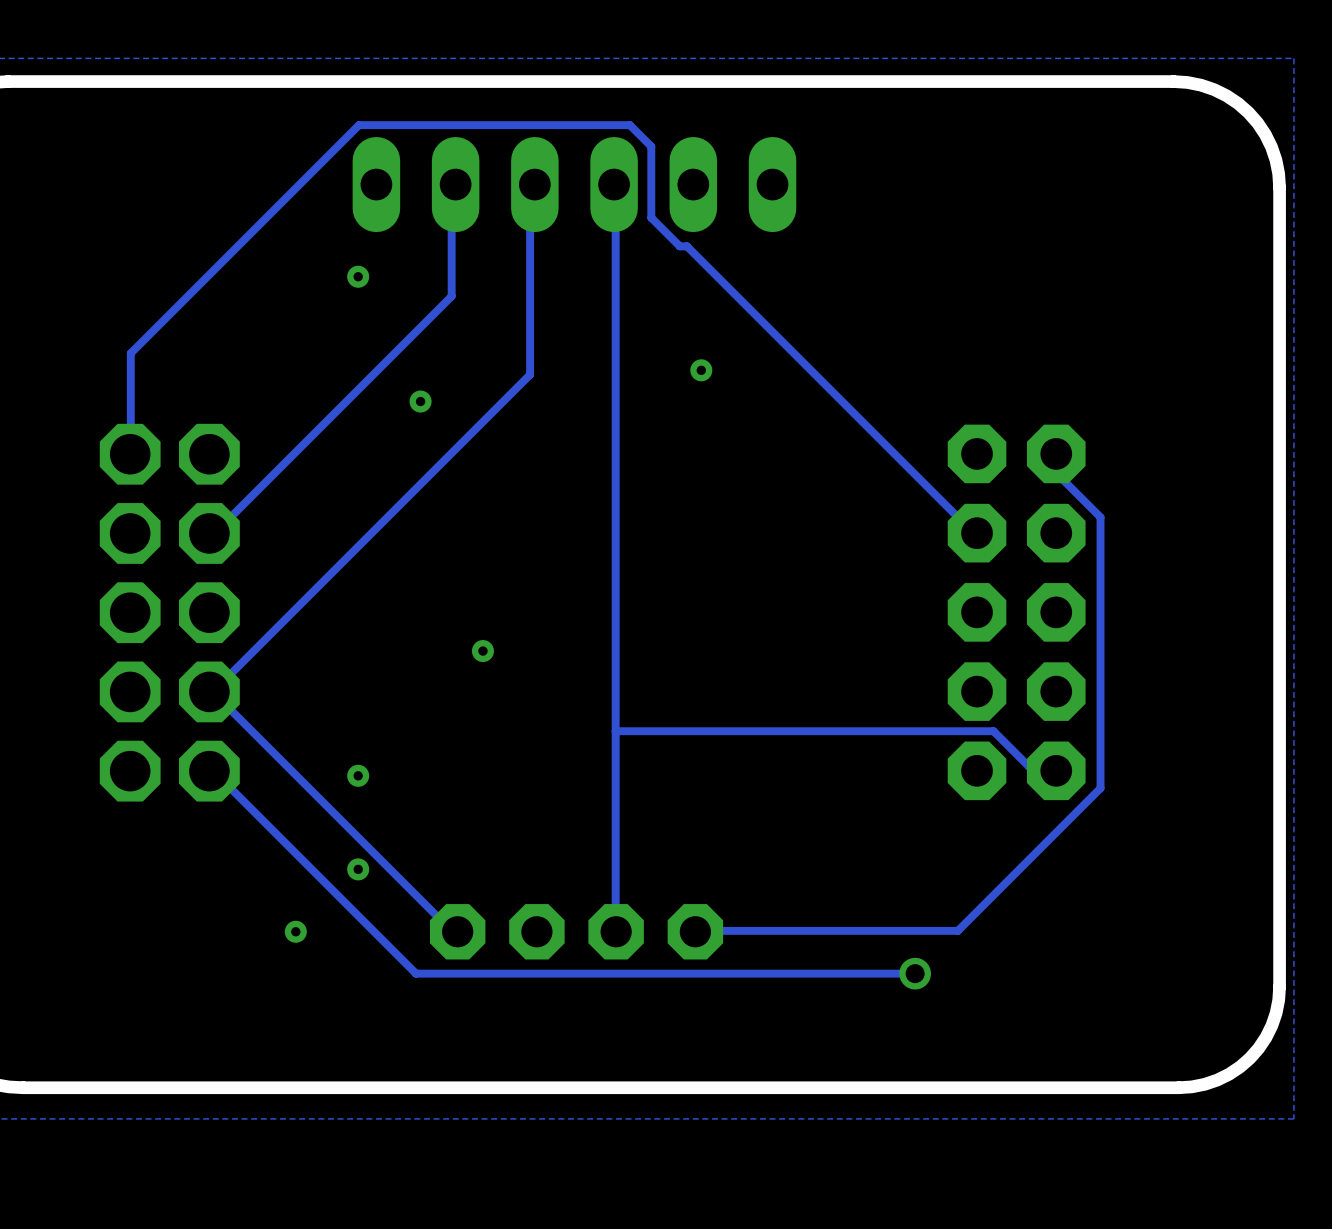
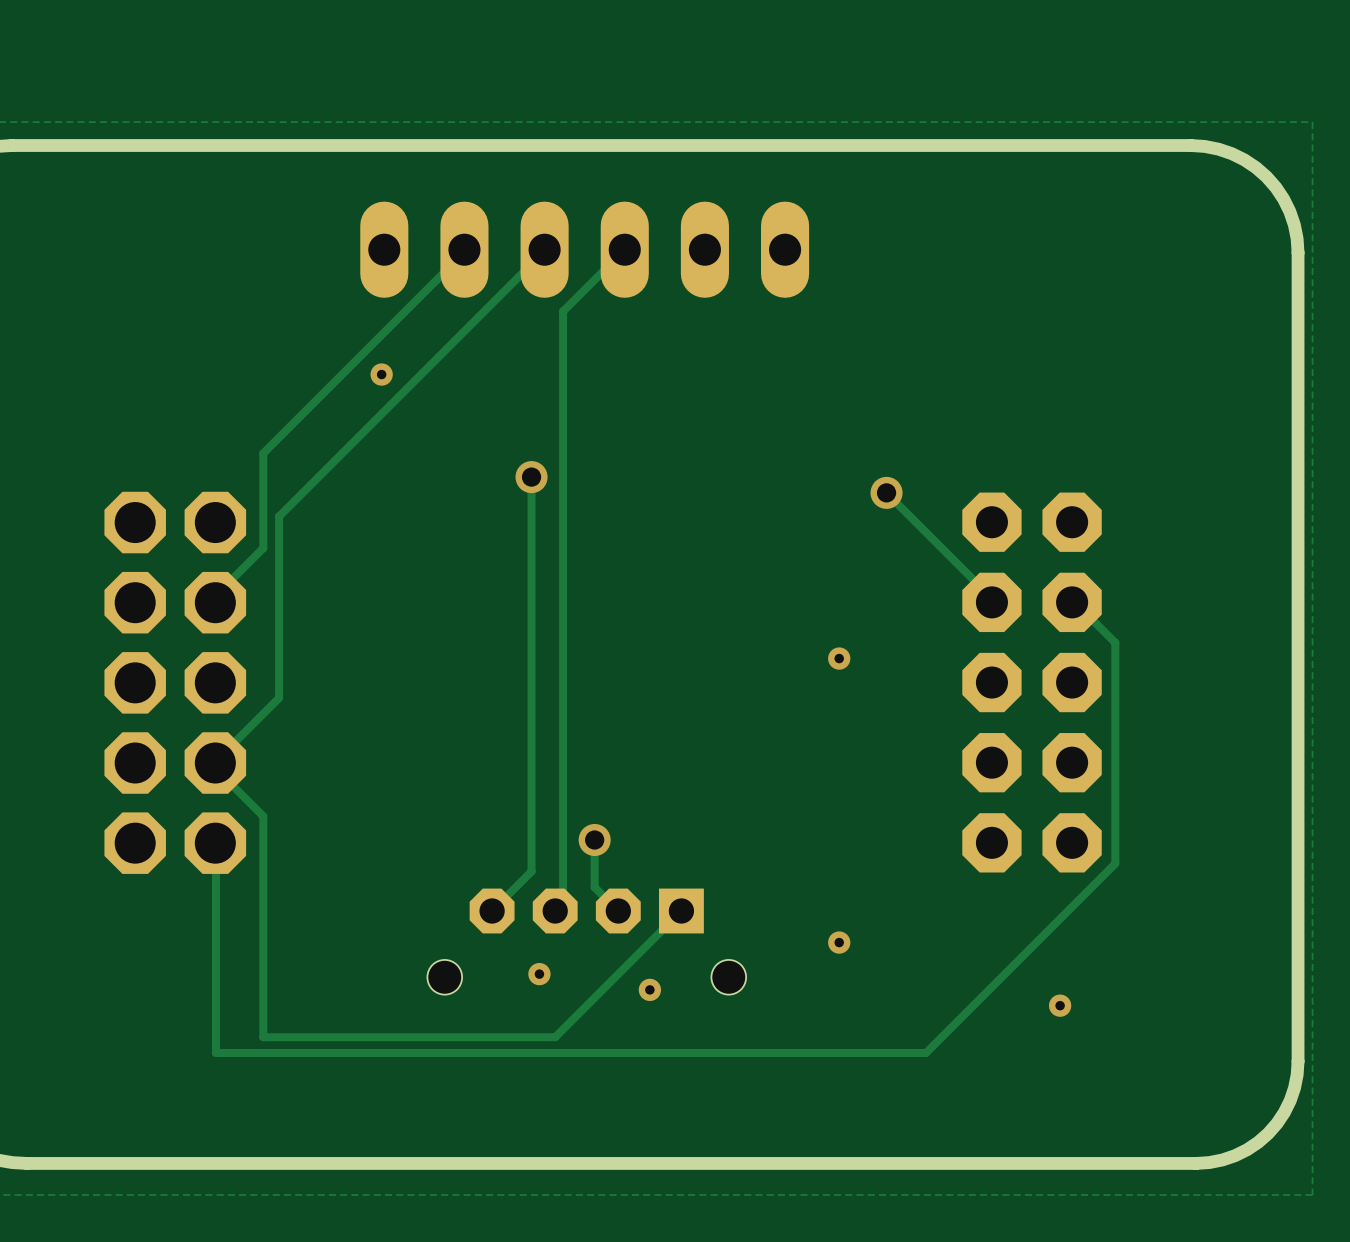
track: (455, 184) (451, 189) (451, 296) (216, 531) (209, 533) -> (464, 249) (460, 256) (263, 453) (263, 548) (215, 595) (215, 602)
track: (534, 184) (530, 189) (530, 374) (216, 688) (209, 691) (216, 695) (451, 930) (457, 931) -> (544, 249) (279, 516) (279, 698) (215, 763) (215, 769) (263, 816) (263, 1037) (555, 1037) (681, 911)
track: (614, 184) (615, 189) (616, 931) -> (624, 249) (563, 311) (563, 903) (555, 911)
via position: (358, 276) -> (381, 374)
via: (701, 370) -> none
via: (420, 401) -> none
track: none -> (531, 477) (531, 871) (492, 911)
via: none -> (531, 477)
via: none -> (886, 492)
track: (1056, 453) (1057, 474) (1100, 517) (1100, 788) (957, 930) (695, 931) -> none
track: (130, 454) (130, 353) (358, 125) (629, 125) (651, 146) (651, 217) (679, 246) (686, 246) (972, 531) (977, 533) -> (886, 492) (989, 595) (991, 602)
via: none -> (839, 658)
via: (482, 651) -> none
track: (615, 731) (993, 731) (1029, 766) (1050, 766) (1056, 770) -> none
track: none -> (594, 840) (594, 887) (618, 911)
via: none -> (594, 840)
track: (209, 771) (216, 773) (416, 973) (915, 973) -> (215, 843) (215, 1053) (926, 1053) (1115, 863) (1115, 642) (1075, 603) (1072, 602)
via: (358, 775) -> none
part: none -> (586, 941)
via: (358, 869) -> none
via: none -> (839, 942)
via: none -> (539, 974)
via: none -> (649, 989)
via: (295, 931) -> none
part: (576, 931) -> none
via: none -> (1060, 1005)
via: (915, 973) -> none

